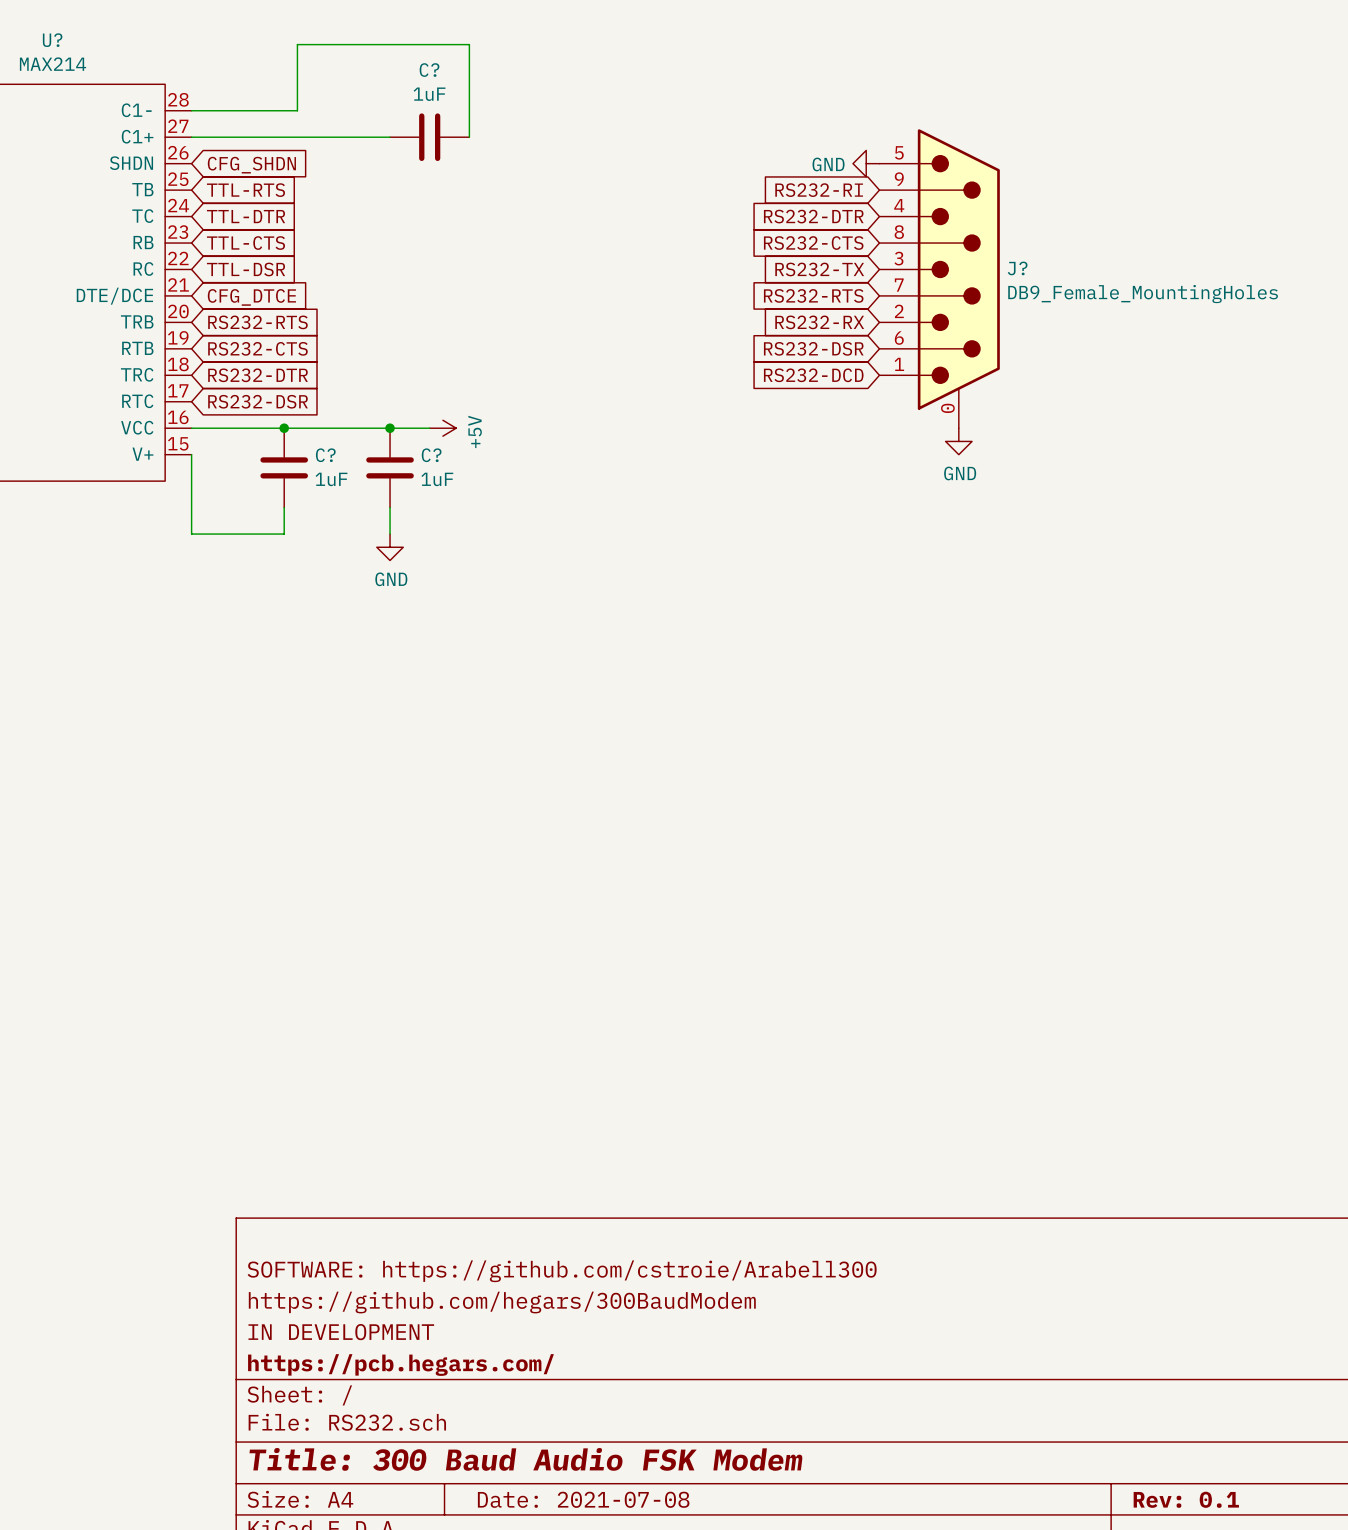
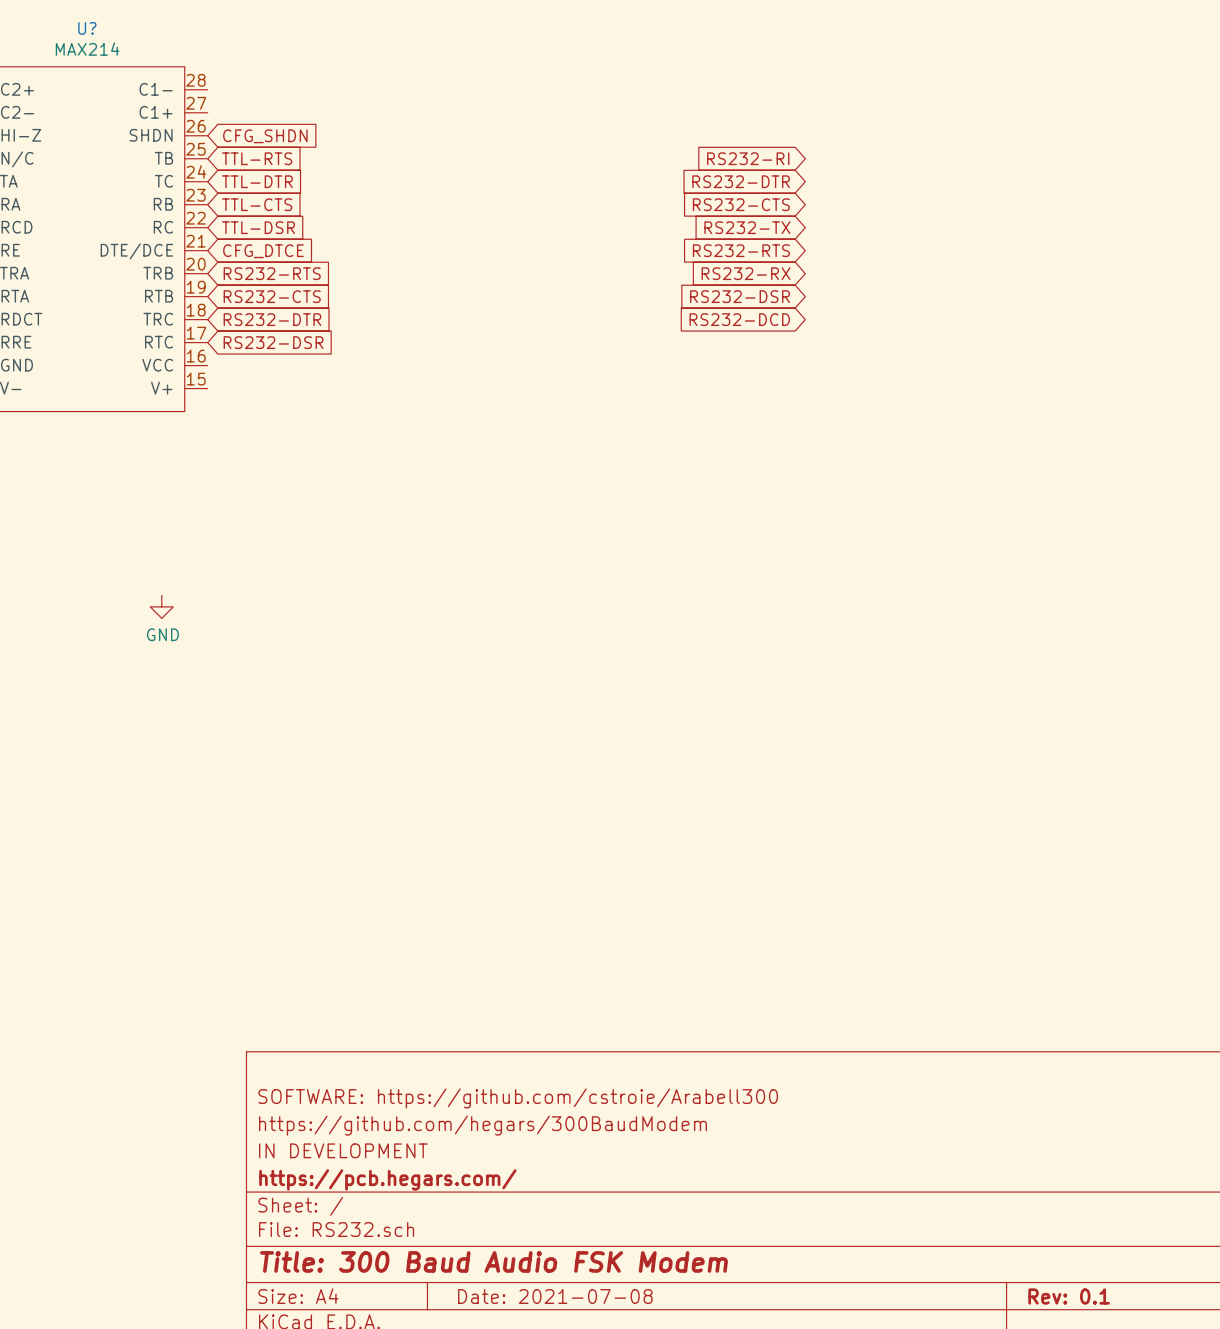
wire: (191, 110) (297, 110) (297, 44) (469, 44) (469, 137) -> none
wire: (191, 137) (390, 137) -> none
C?: 1uF (429, 137) -> none
power symbol: GND (866, 163) -> none
J?: DB9_Female_MountingHoles (939, 278) -> none
wire: (191, 428) (429, 428) -> none
junction: (284, 428) -> none
junction: (390, 428) -> none
power symbol: +5V (442, 428) -> none
power symbol: GND (958, 441) -> none
wire: (191, 454) (191, 534) (284, 534) (284, 507) -> none
C?: 1uF (284, 467) -> none
C?: 1uF (390, 467) -> none
wire: (390, 507) (390, 534) -> none
power symbol: GND (390, 547) -> none
power symbol: none -> GND (161, 606)

